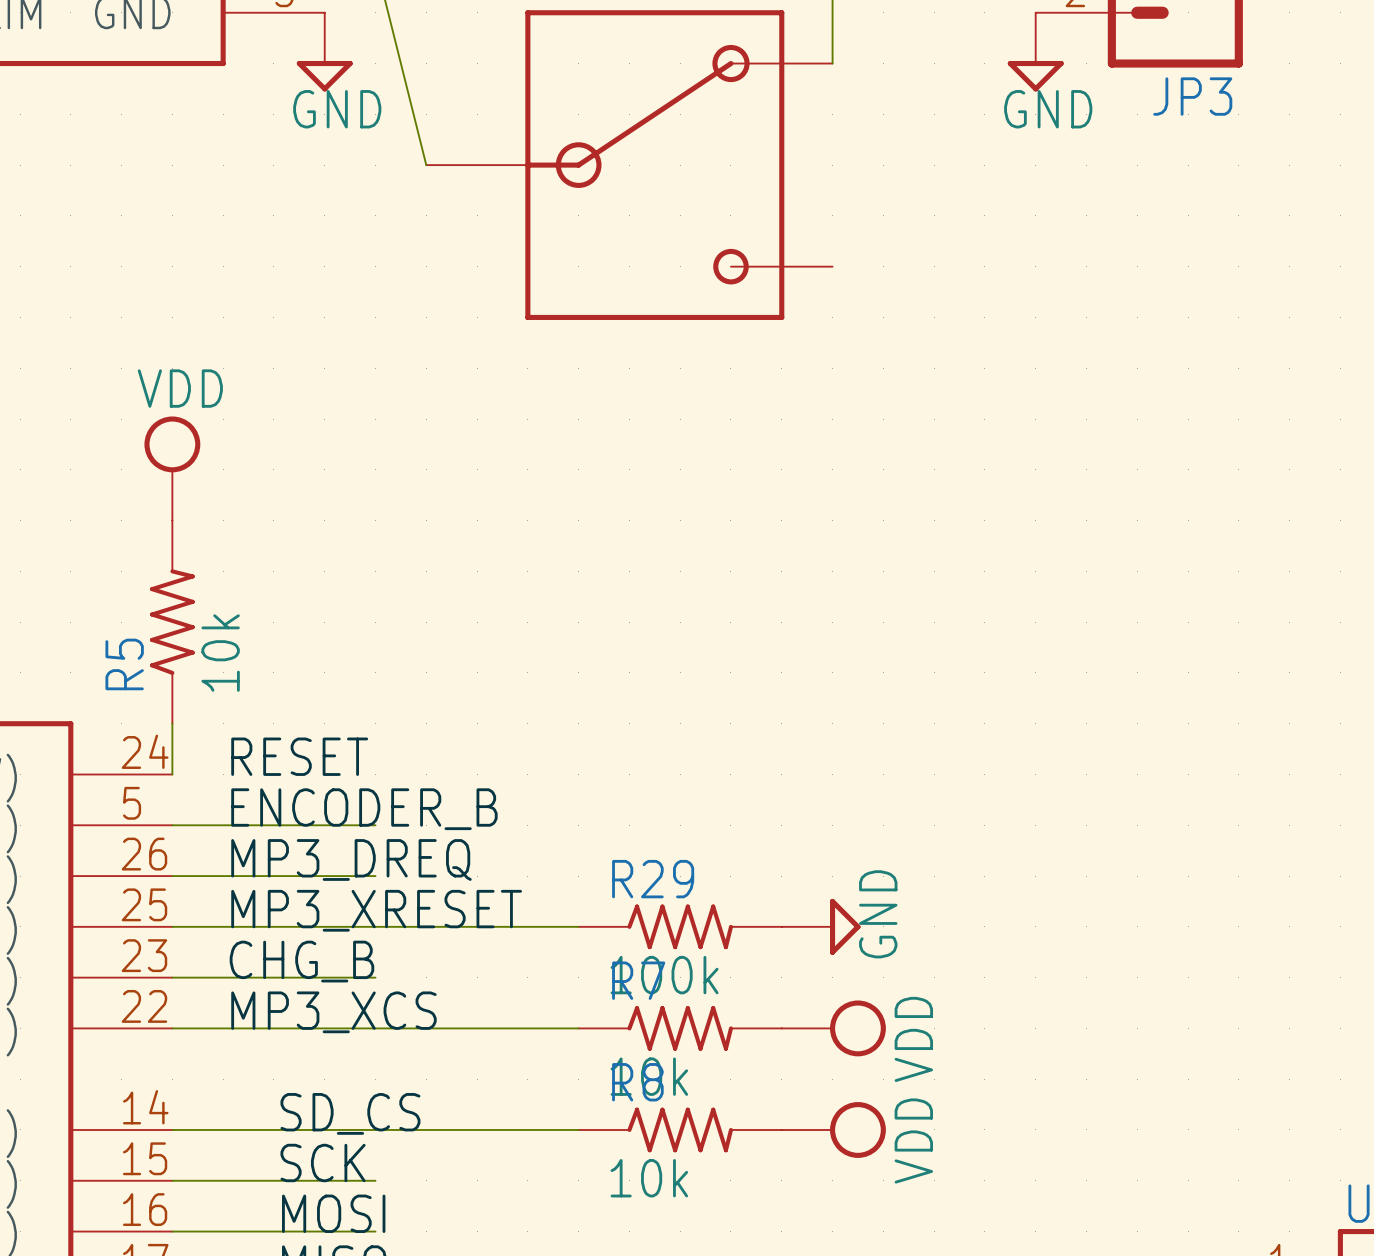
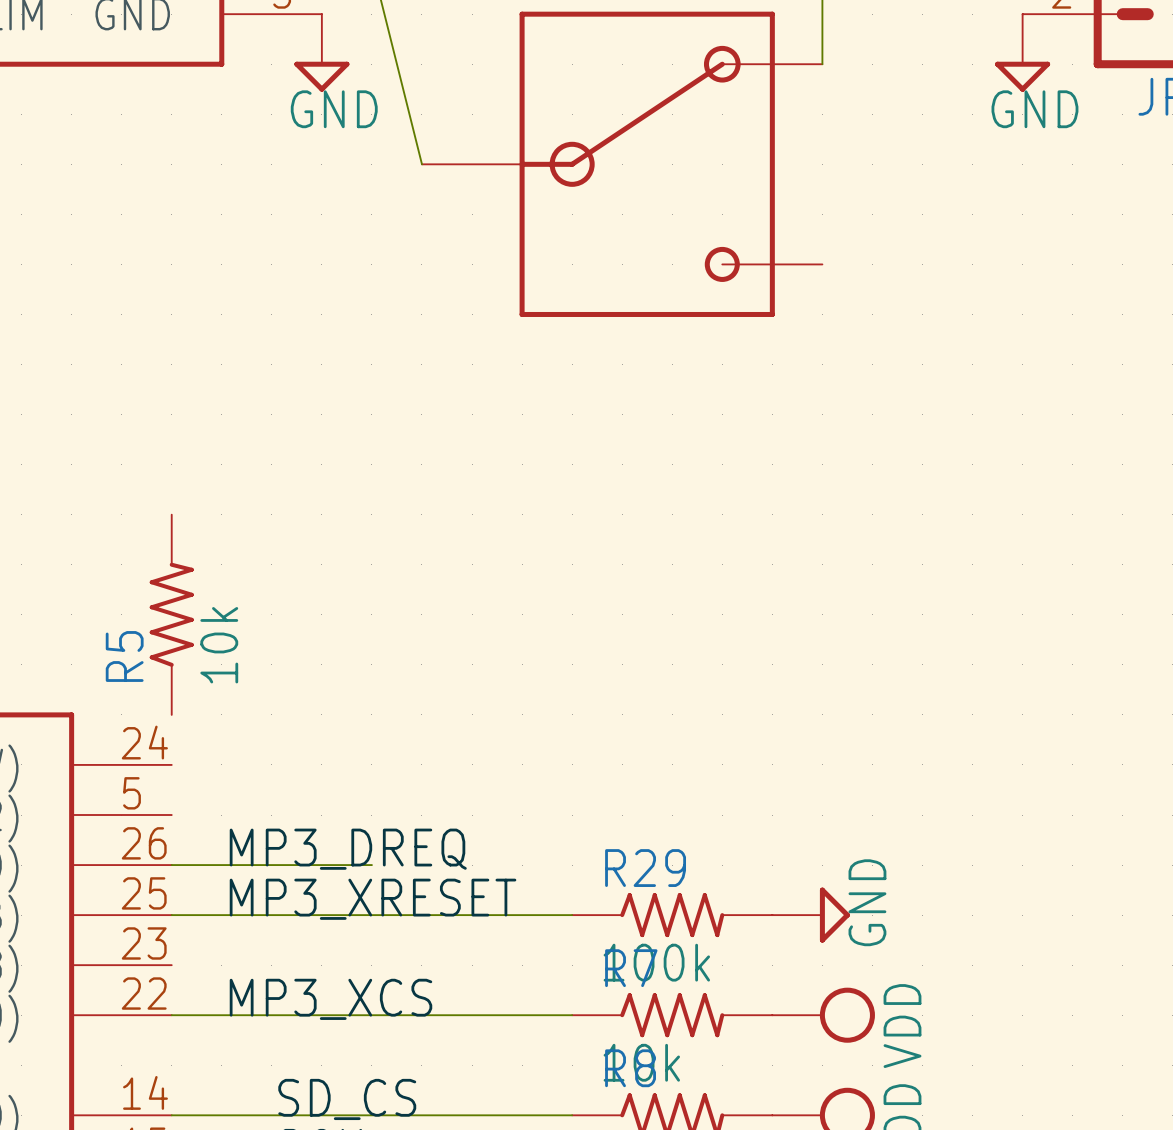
power symbol: VDD (172, 468) -> none
wire: (172, 723) (172, 774) -> none
label: RESET (299, 756) -> none
label: ENCODER_B (364, 809) -> none
wire: (172, 825) (375, 825) -> none
label: CHG_B (301, 961) -> none
wire: (172, 977) (375, 977) -> none

